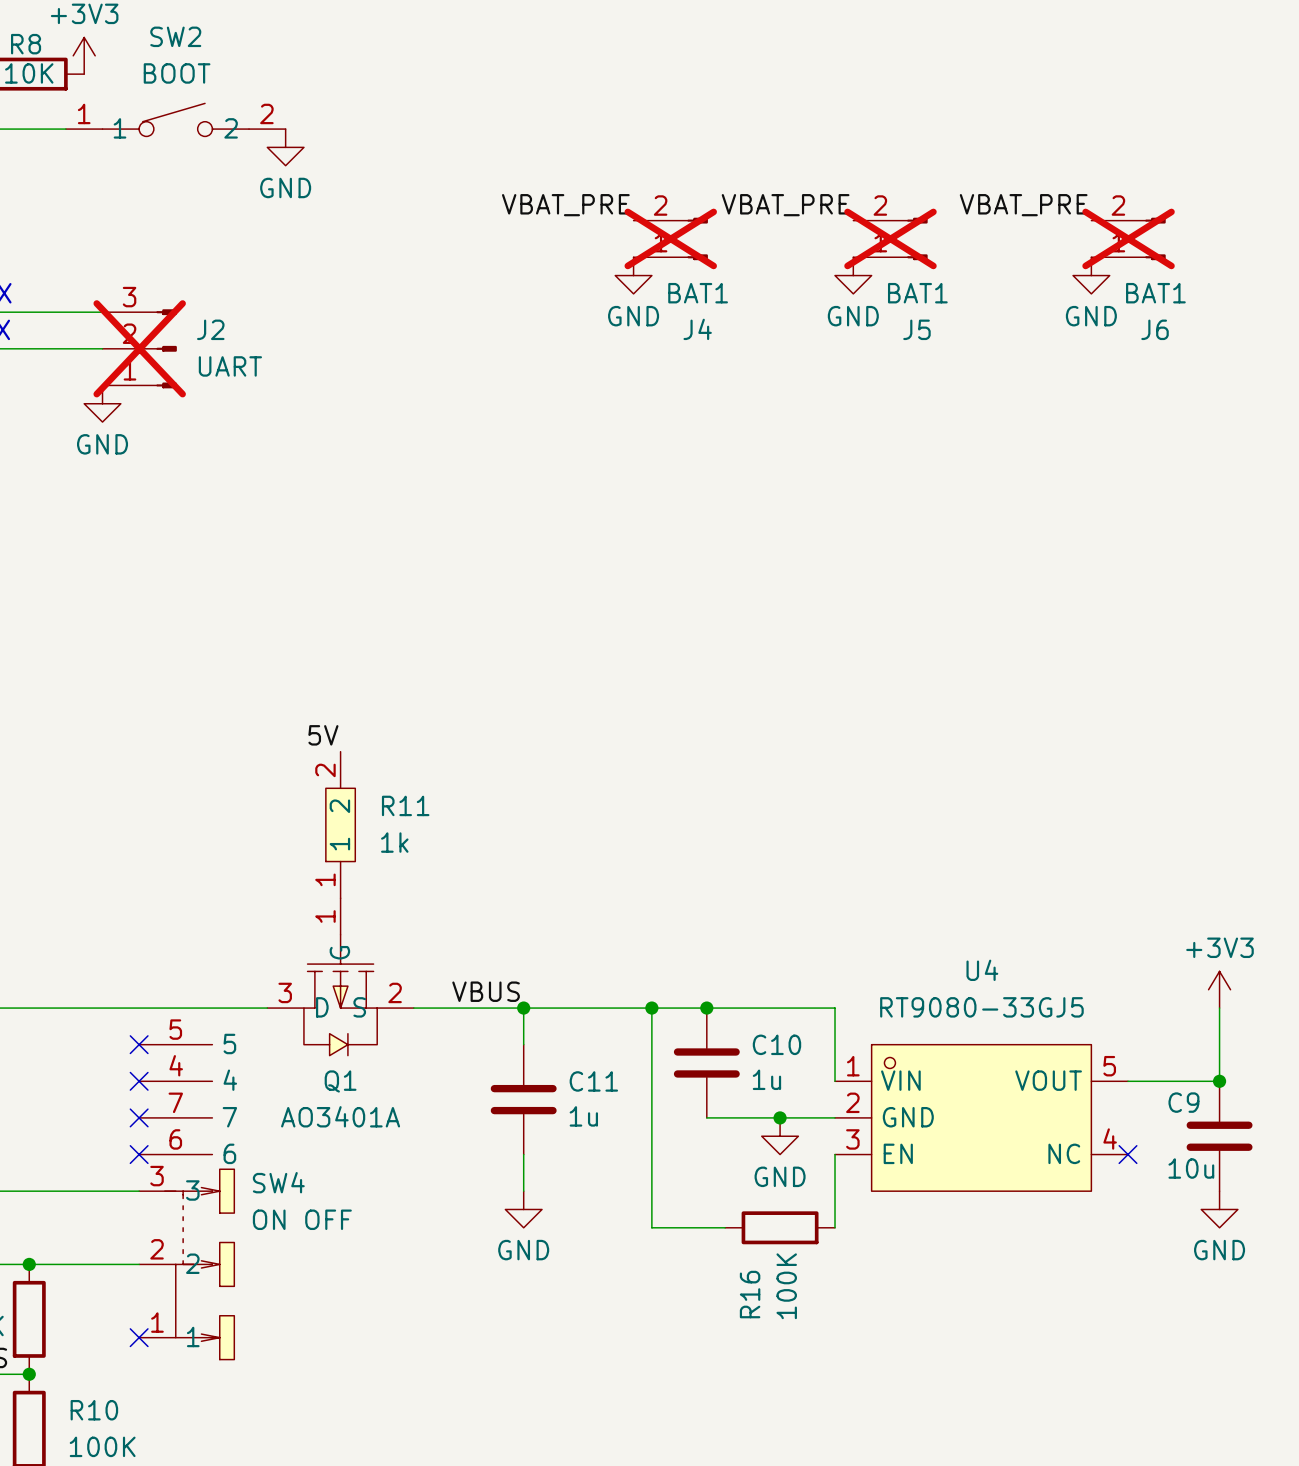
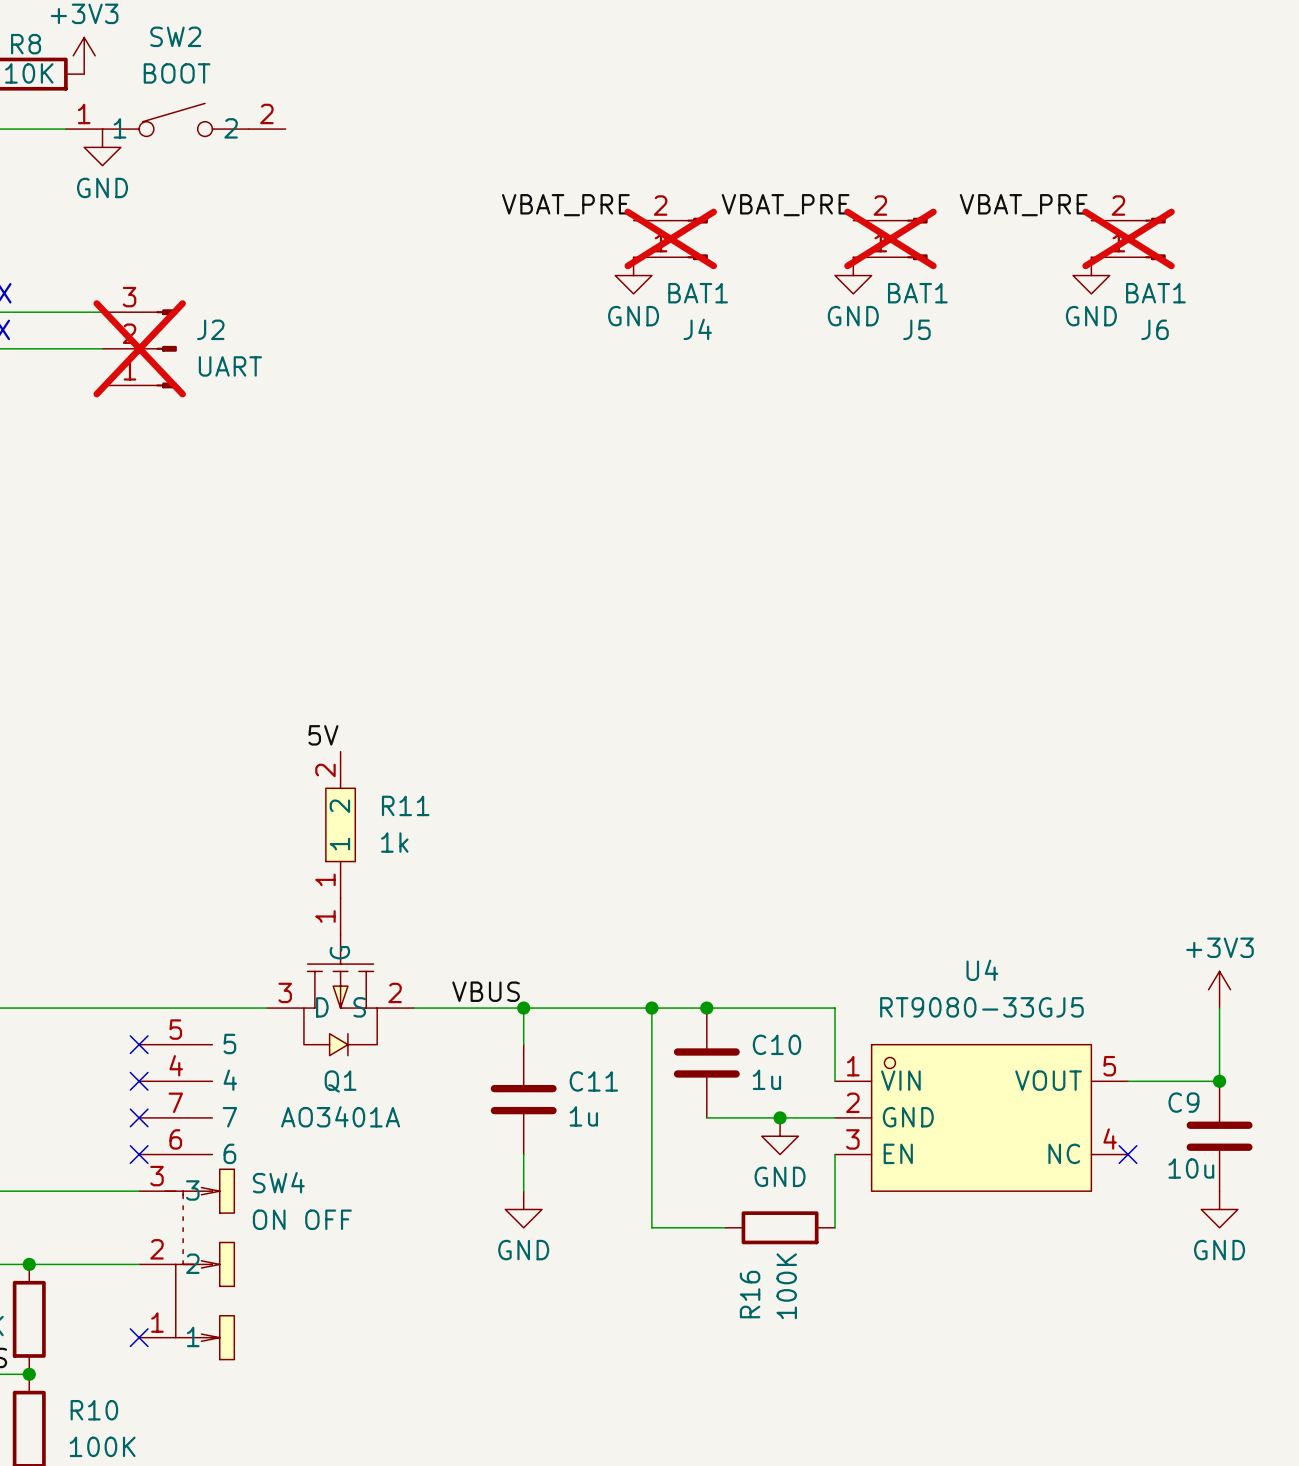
power symbol: none -> GND (102, 147)
power symbol: GND (285, 147) -> none
power symbol: GND (102, 403) -> none

